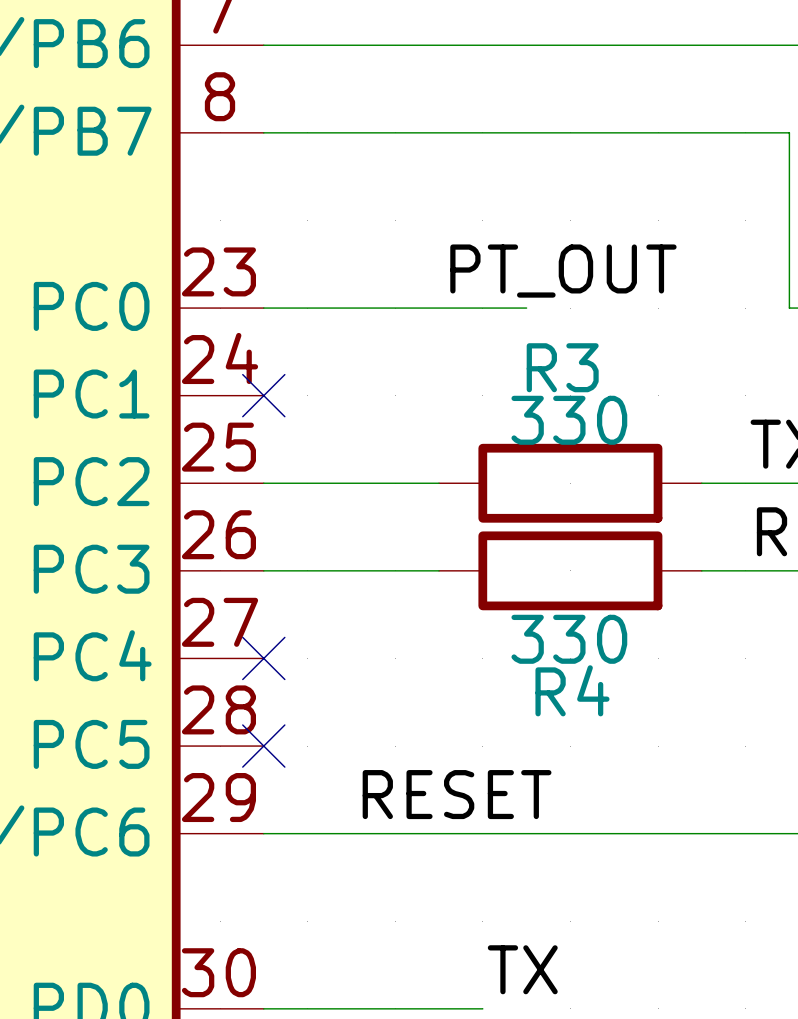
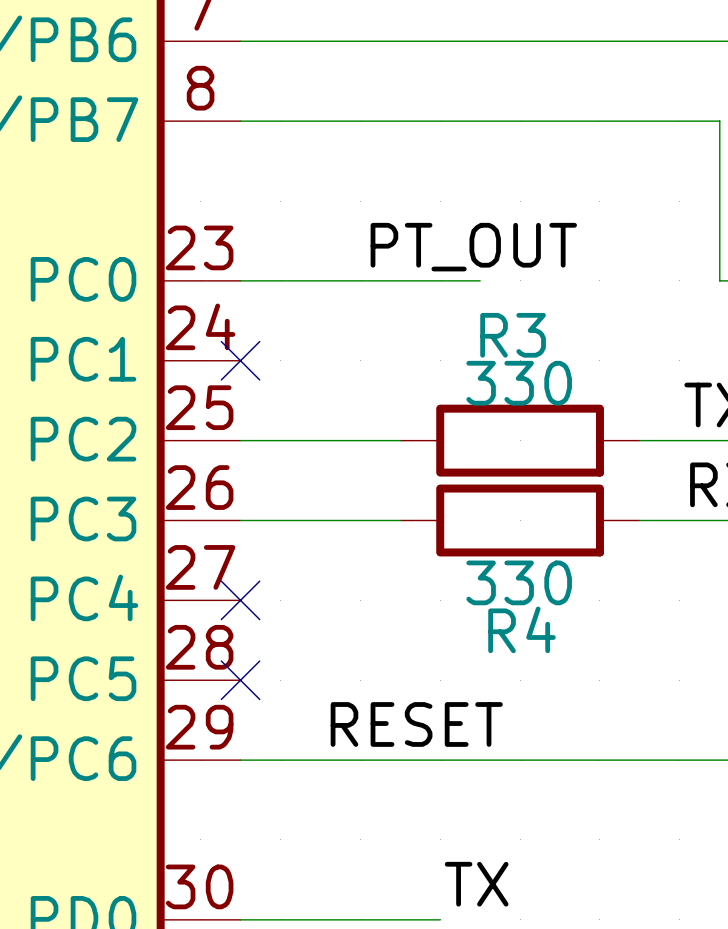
label position: PT_OUT (563, 271) -> PT_OUT (473, 247)

